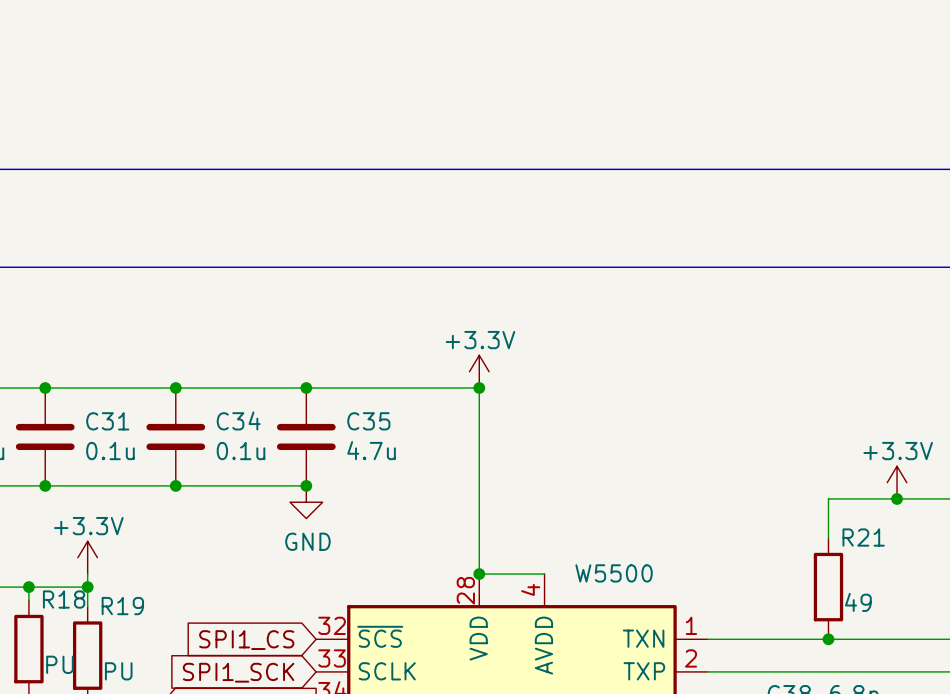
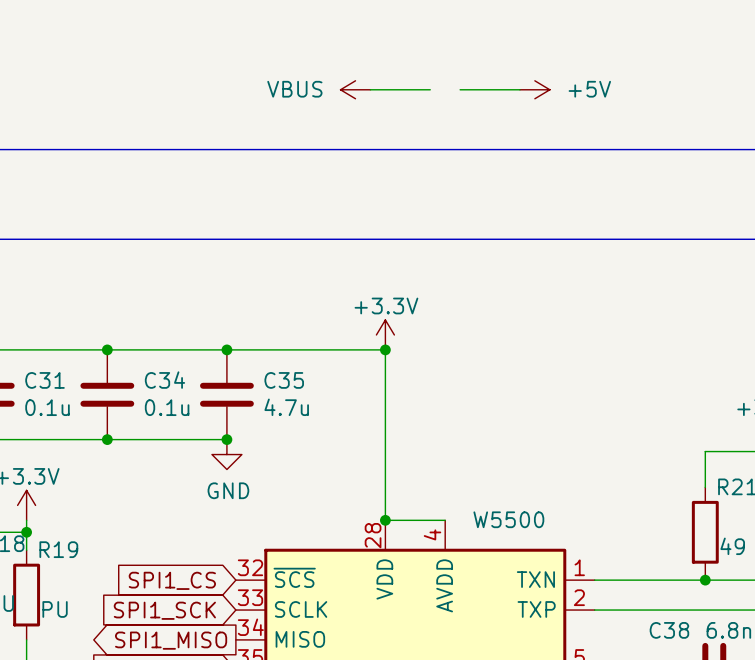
power symbol: none -> VBUS (355, 89)
wire: none -> (370, 89) (430, 89)
wire: none -> (460, 89) (519, 89)
power symbol: none -> +5V (534, 89)

